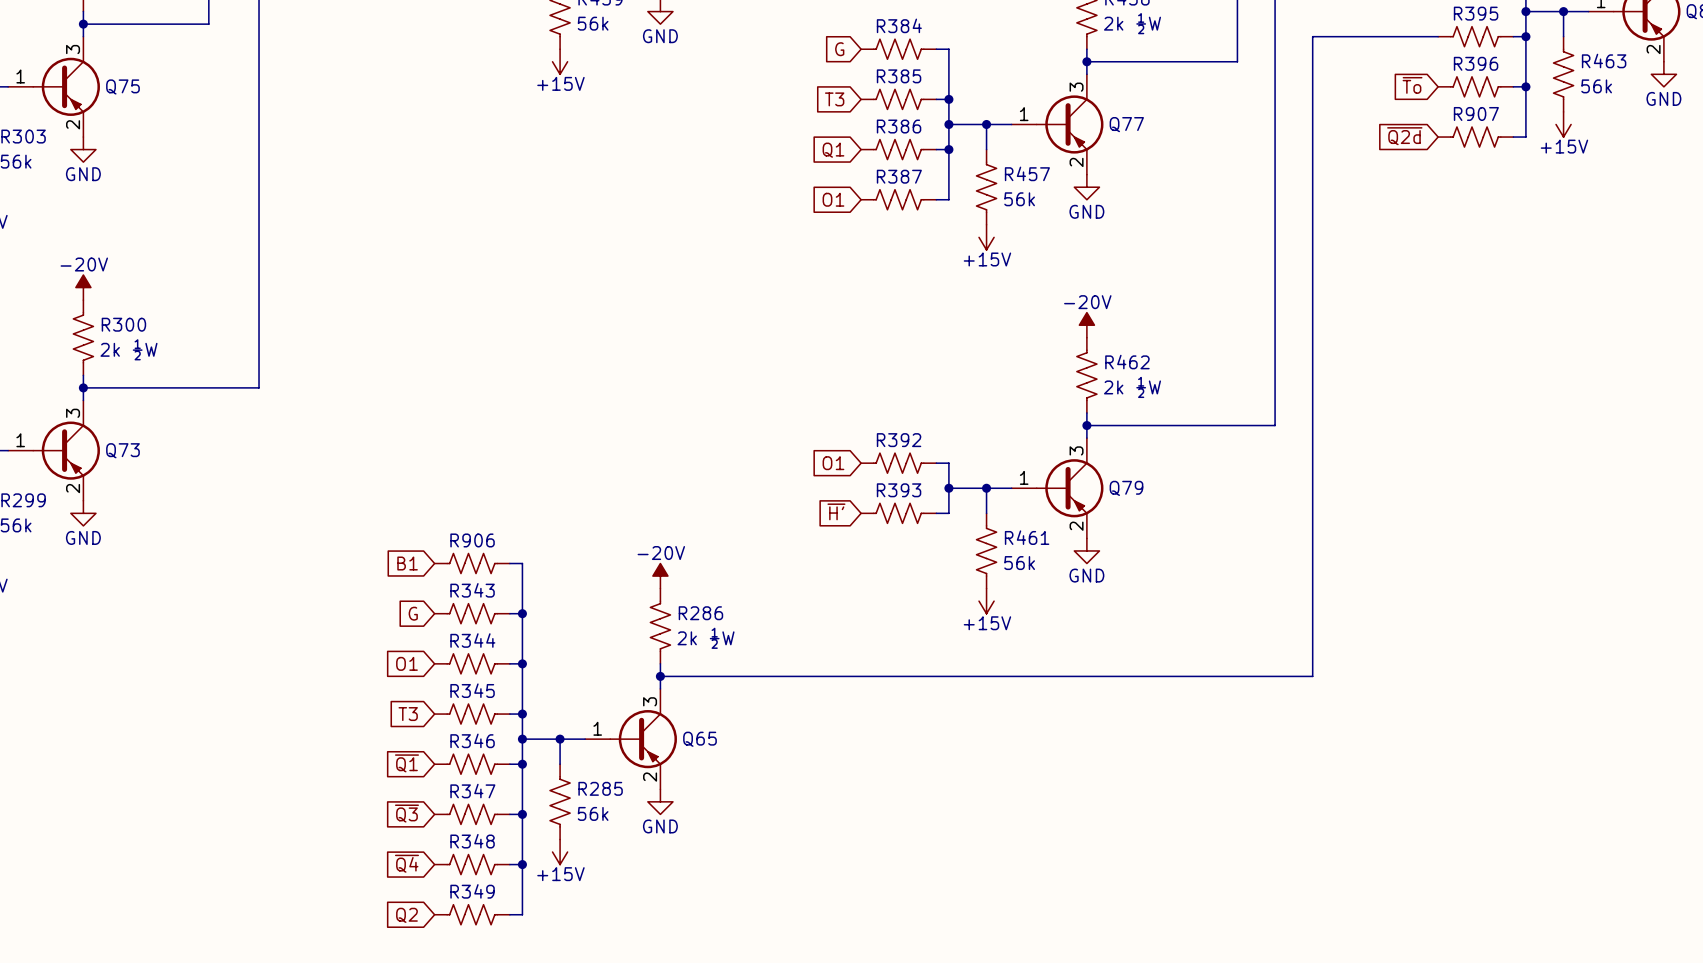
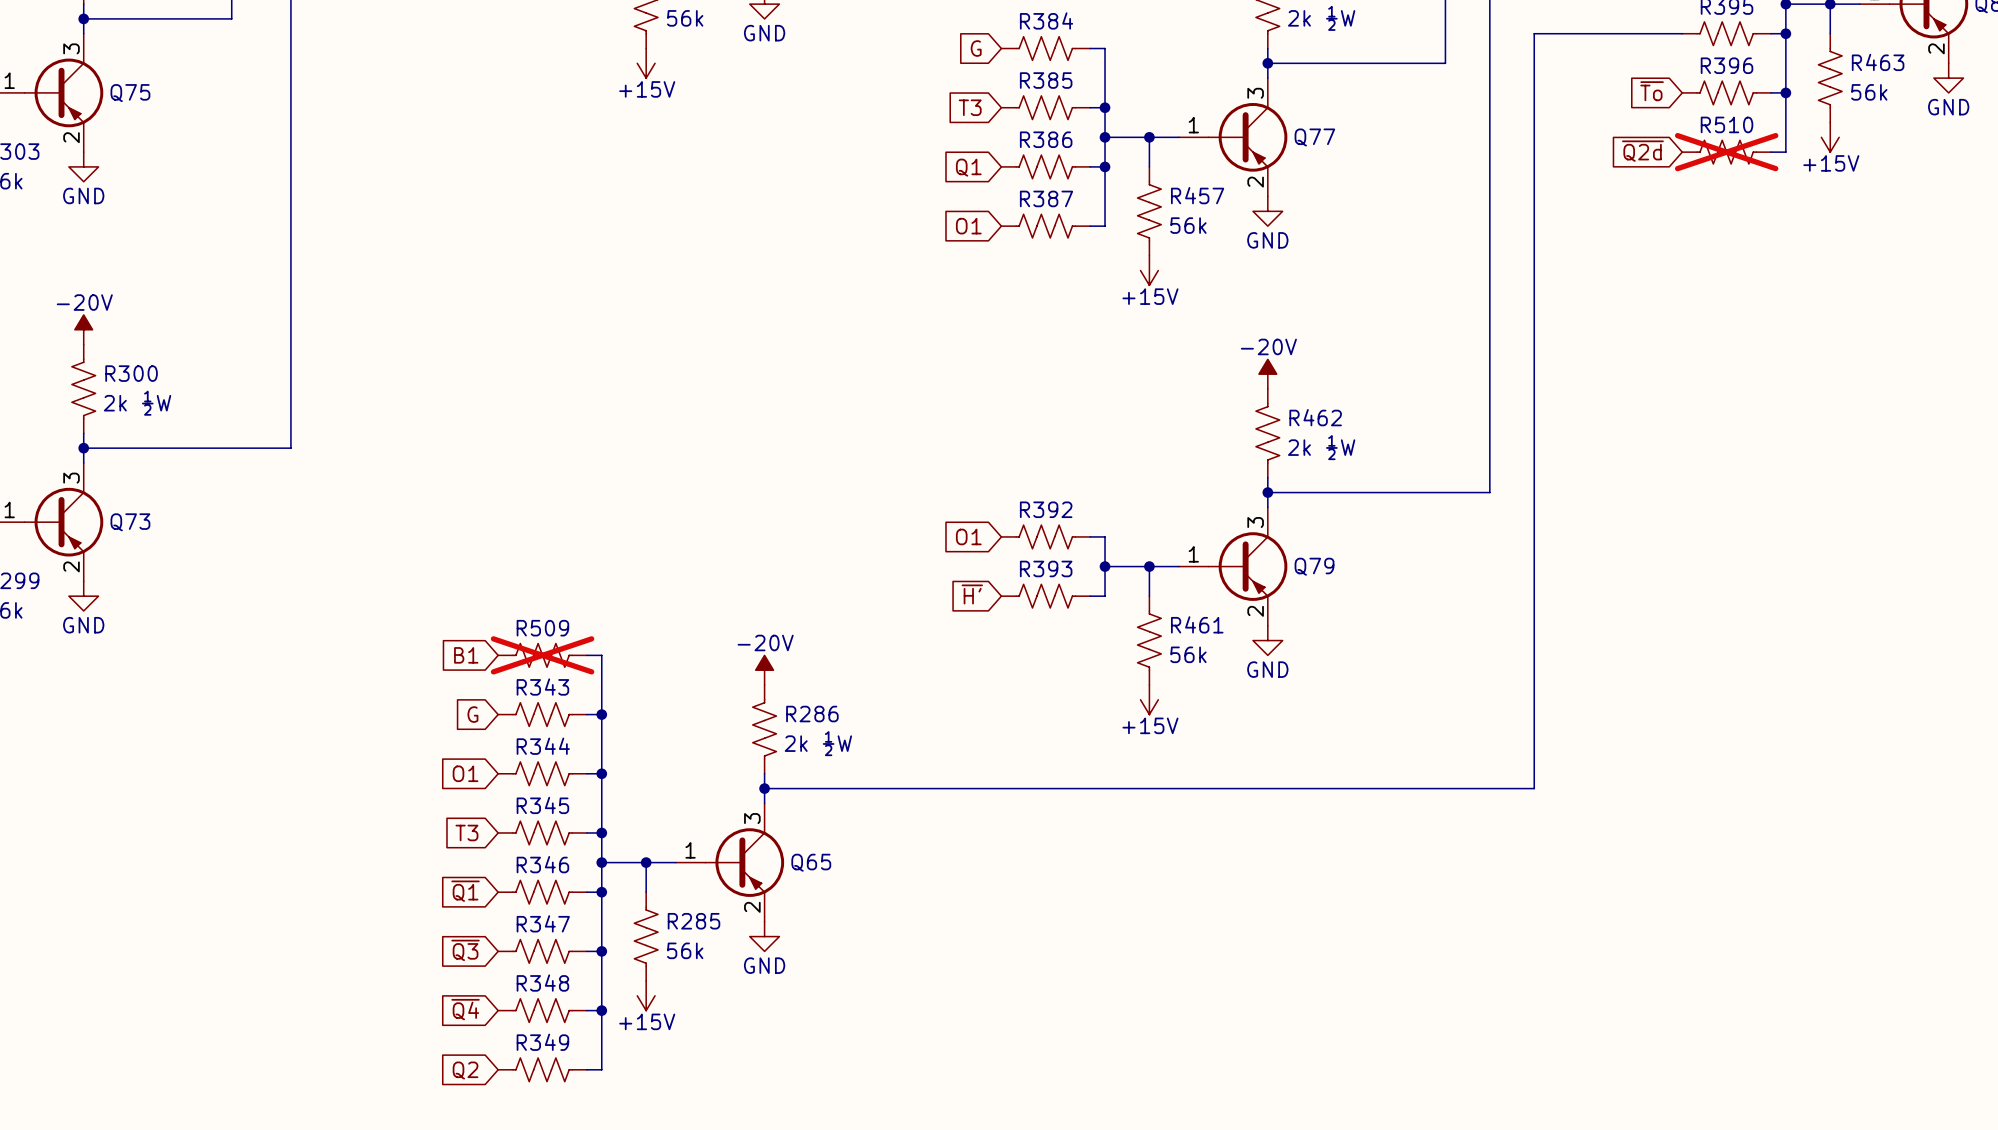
R907 name: R907 (1476, 113) -> R510 (1727, 124)
R907 do-not-place cross: none -> (1726, 152)
R906 name: R906 (472, 540) -> R509 (542, 628)
R906 do-not-place cross: none -> (542, 655)

